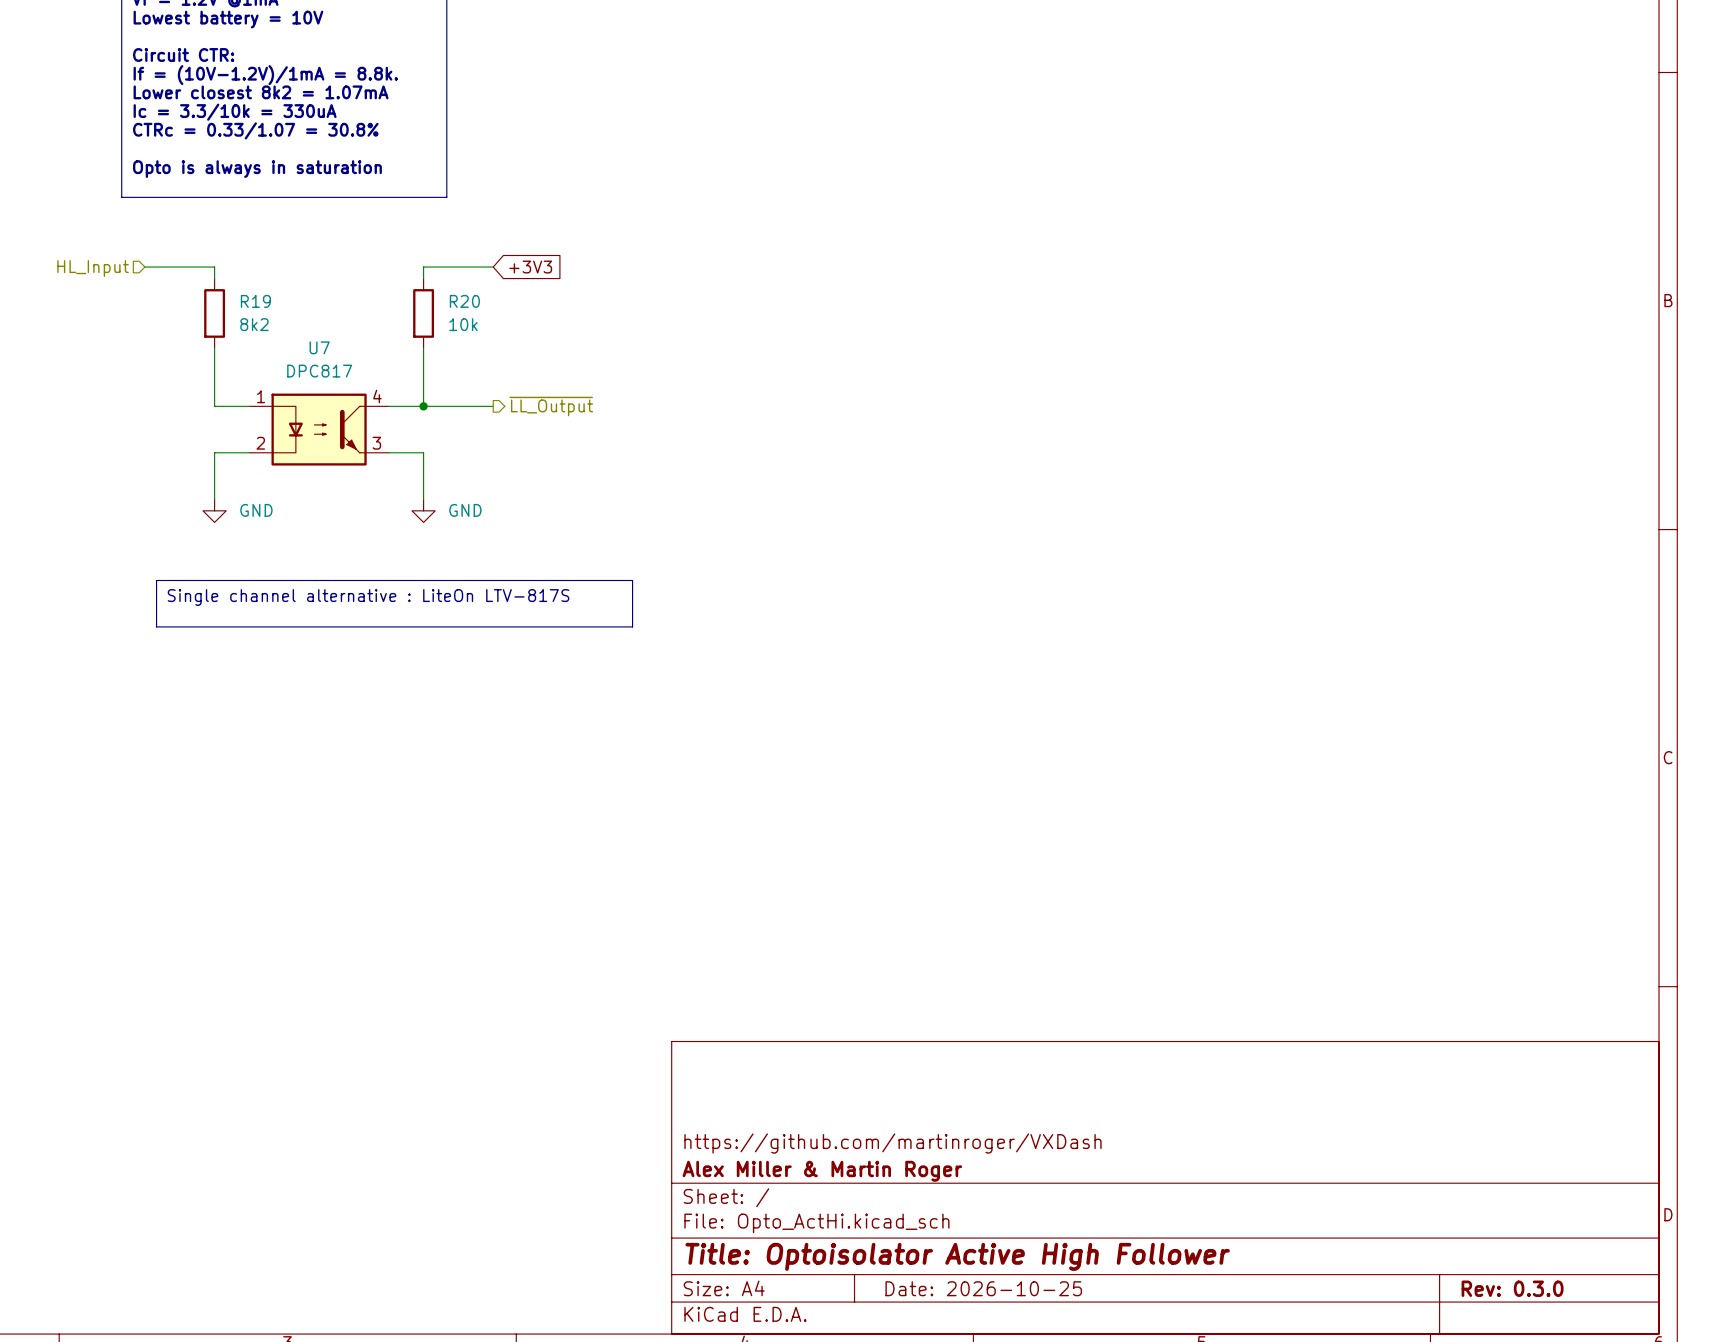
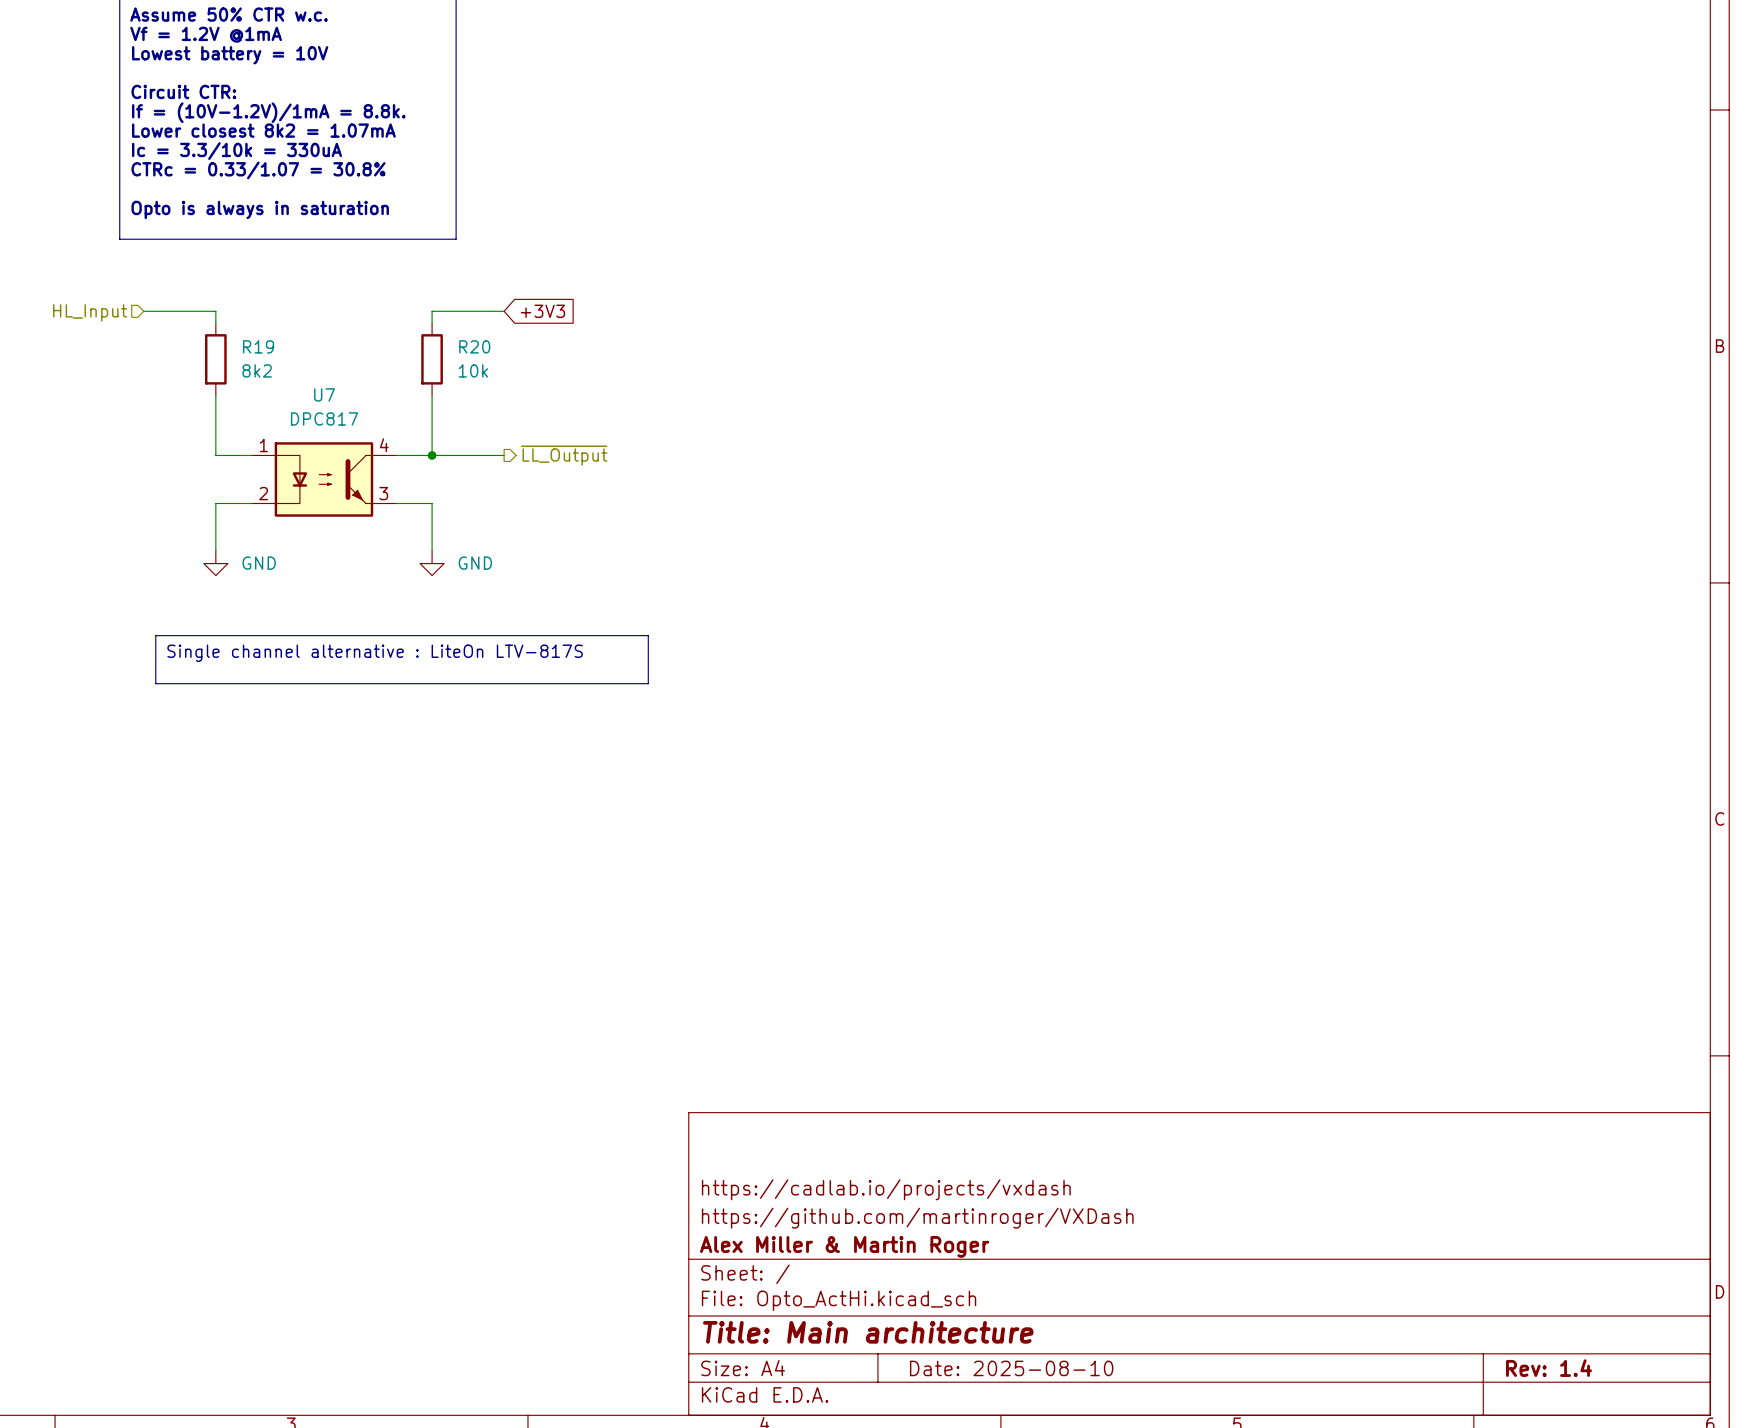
title block: none -> https://cadlab.io/projects/vxdash (886, 1189)
title block: Title: Optoisolator Active High Follower (957, 1256) -> Title: Main architecture (868, 1332)
title block: Date: 2026-10-25 (983, 1288) -> Date: 2025-08-10 (1011, 1368)
title block: Rev: 0.3.0 (1512, 1288) -> Rev: 1.4 (1549, 1368)

